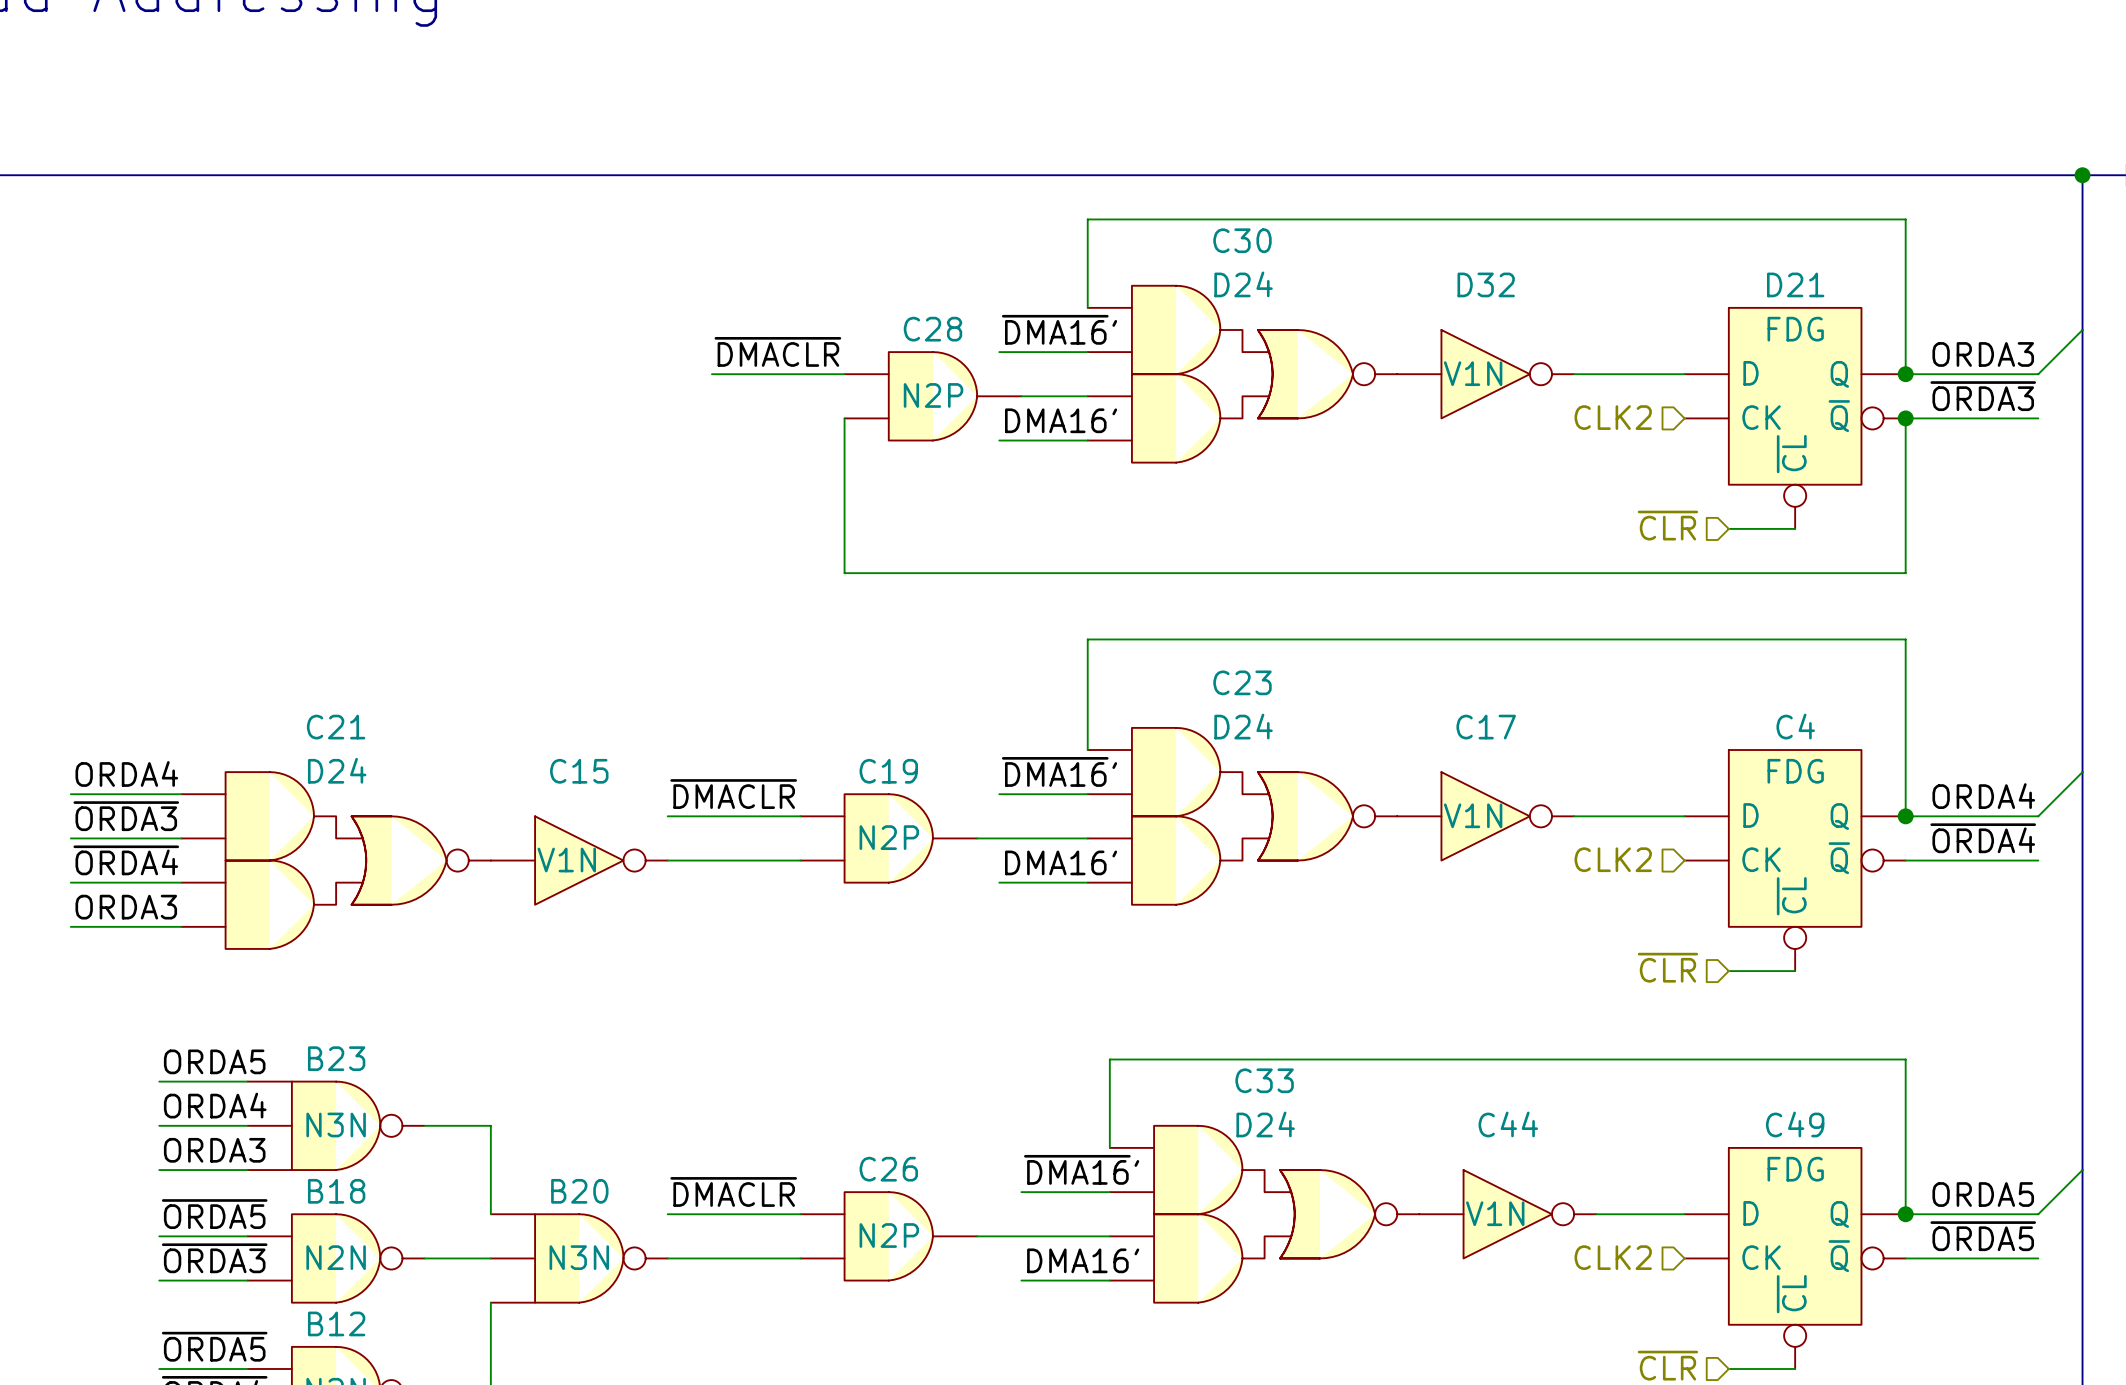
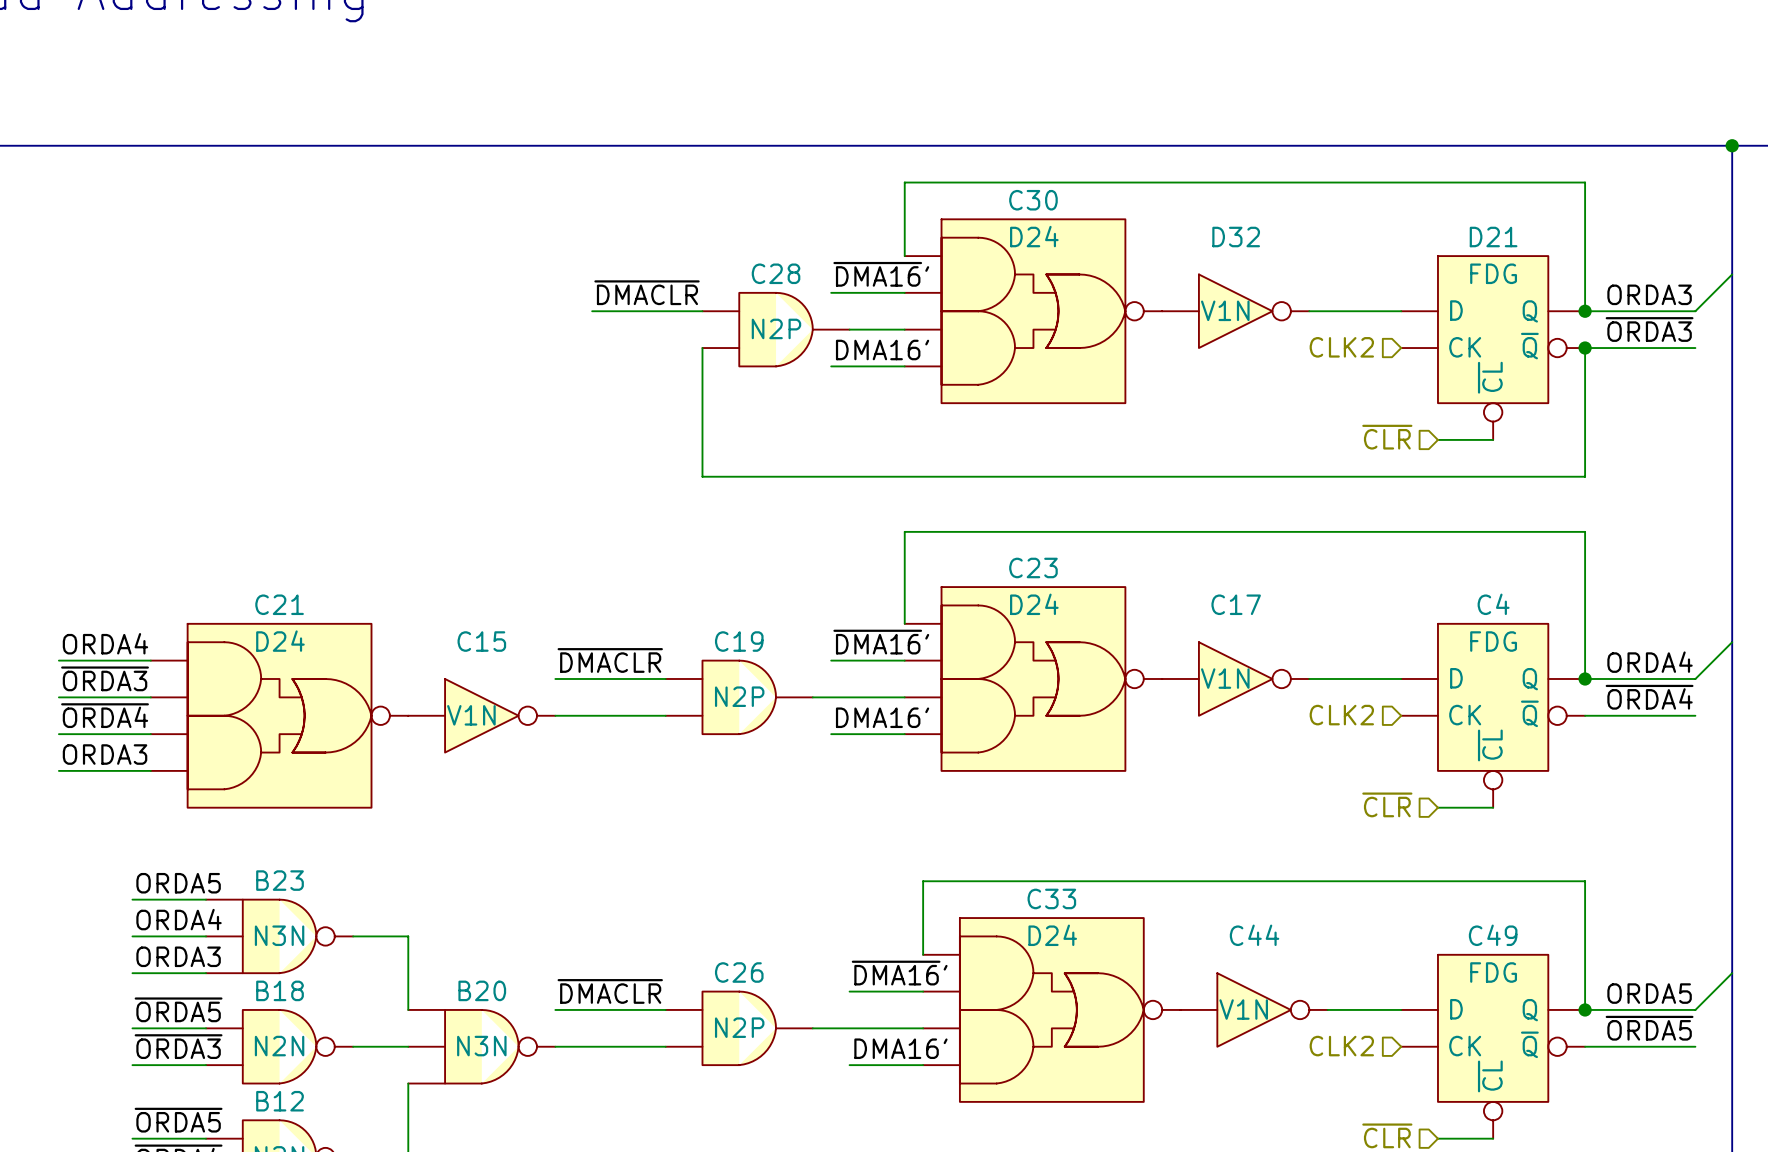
C30 symbol: [1087, 285, 1398, 463] -> [904, 219, 1163, 404]
C23 symbol: [1087, 727, 1398, 905] -> [904, 587, 1163, 771]
C21 symbol: [181, 772, 491, 949] -> [150, 623, 409, 808]
C33 symbol: [1109, 1125, 1420, 1303] -> [923, 918, 1181, 1102]

